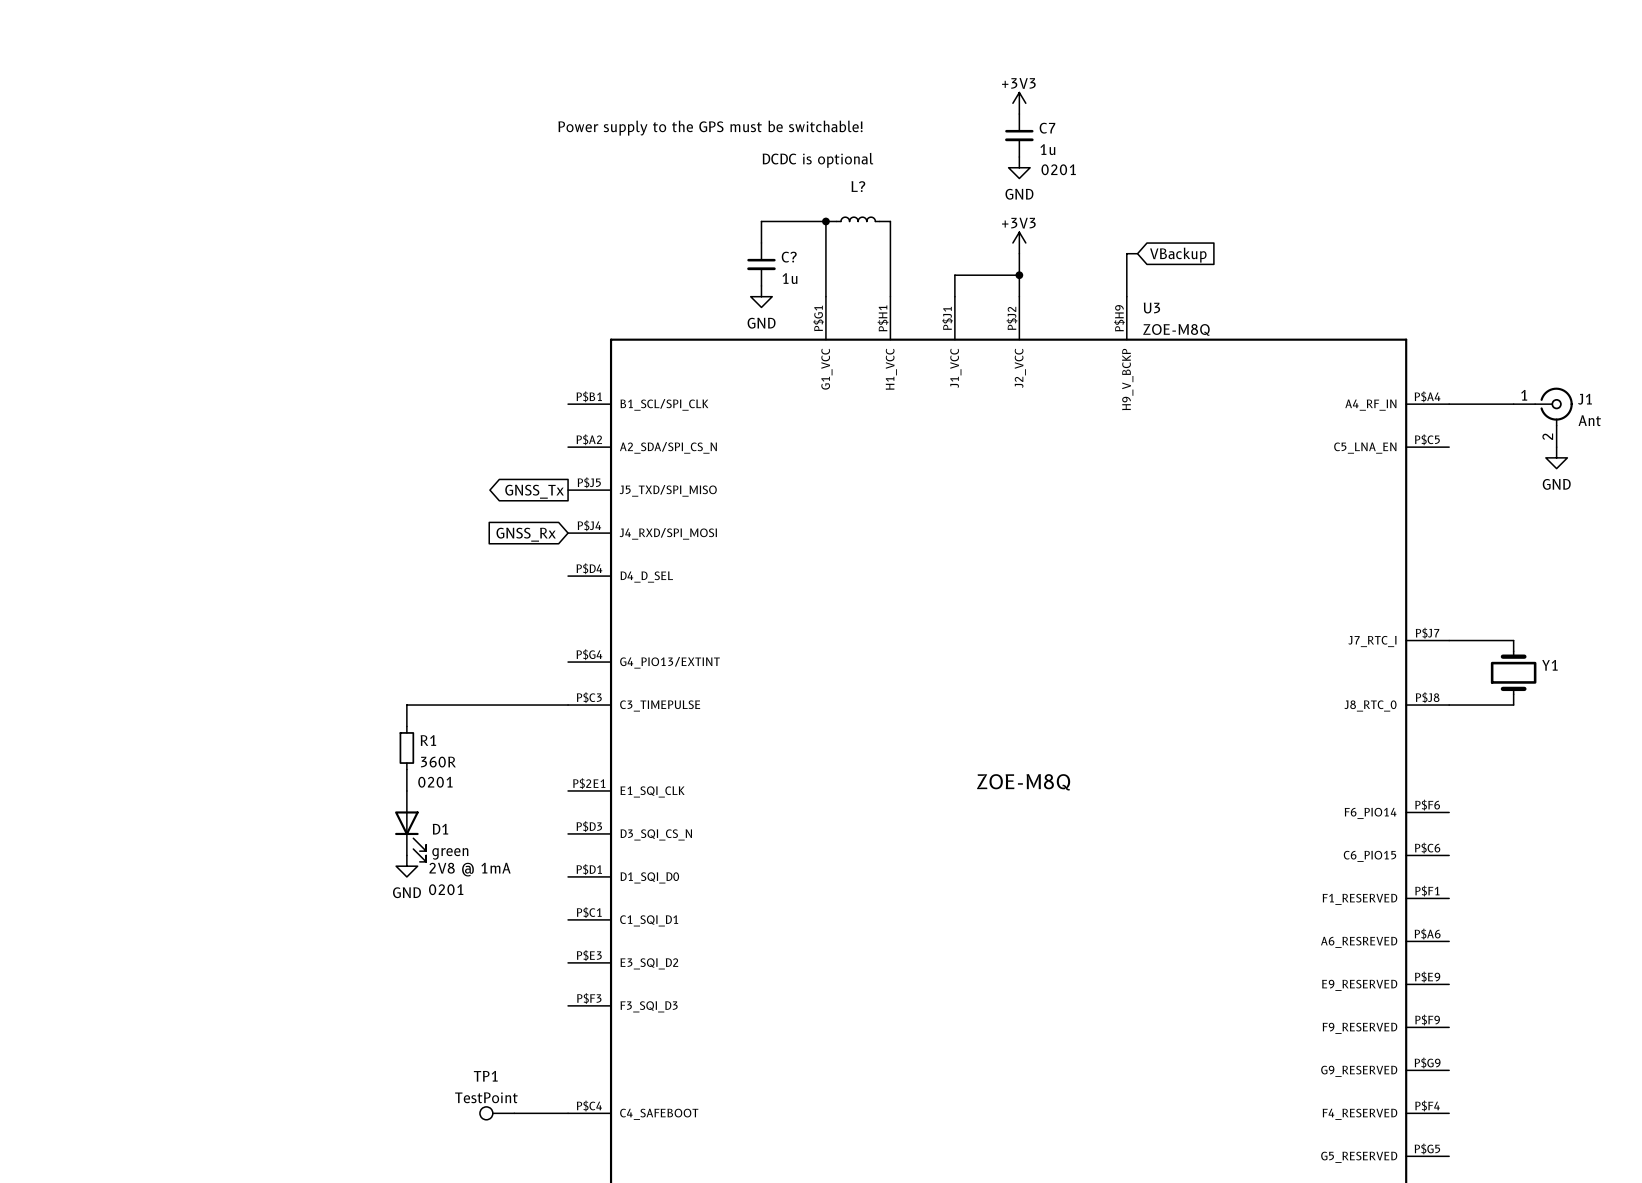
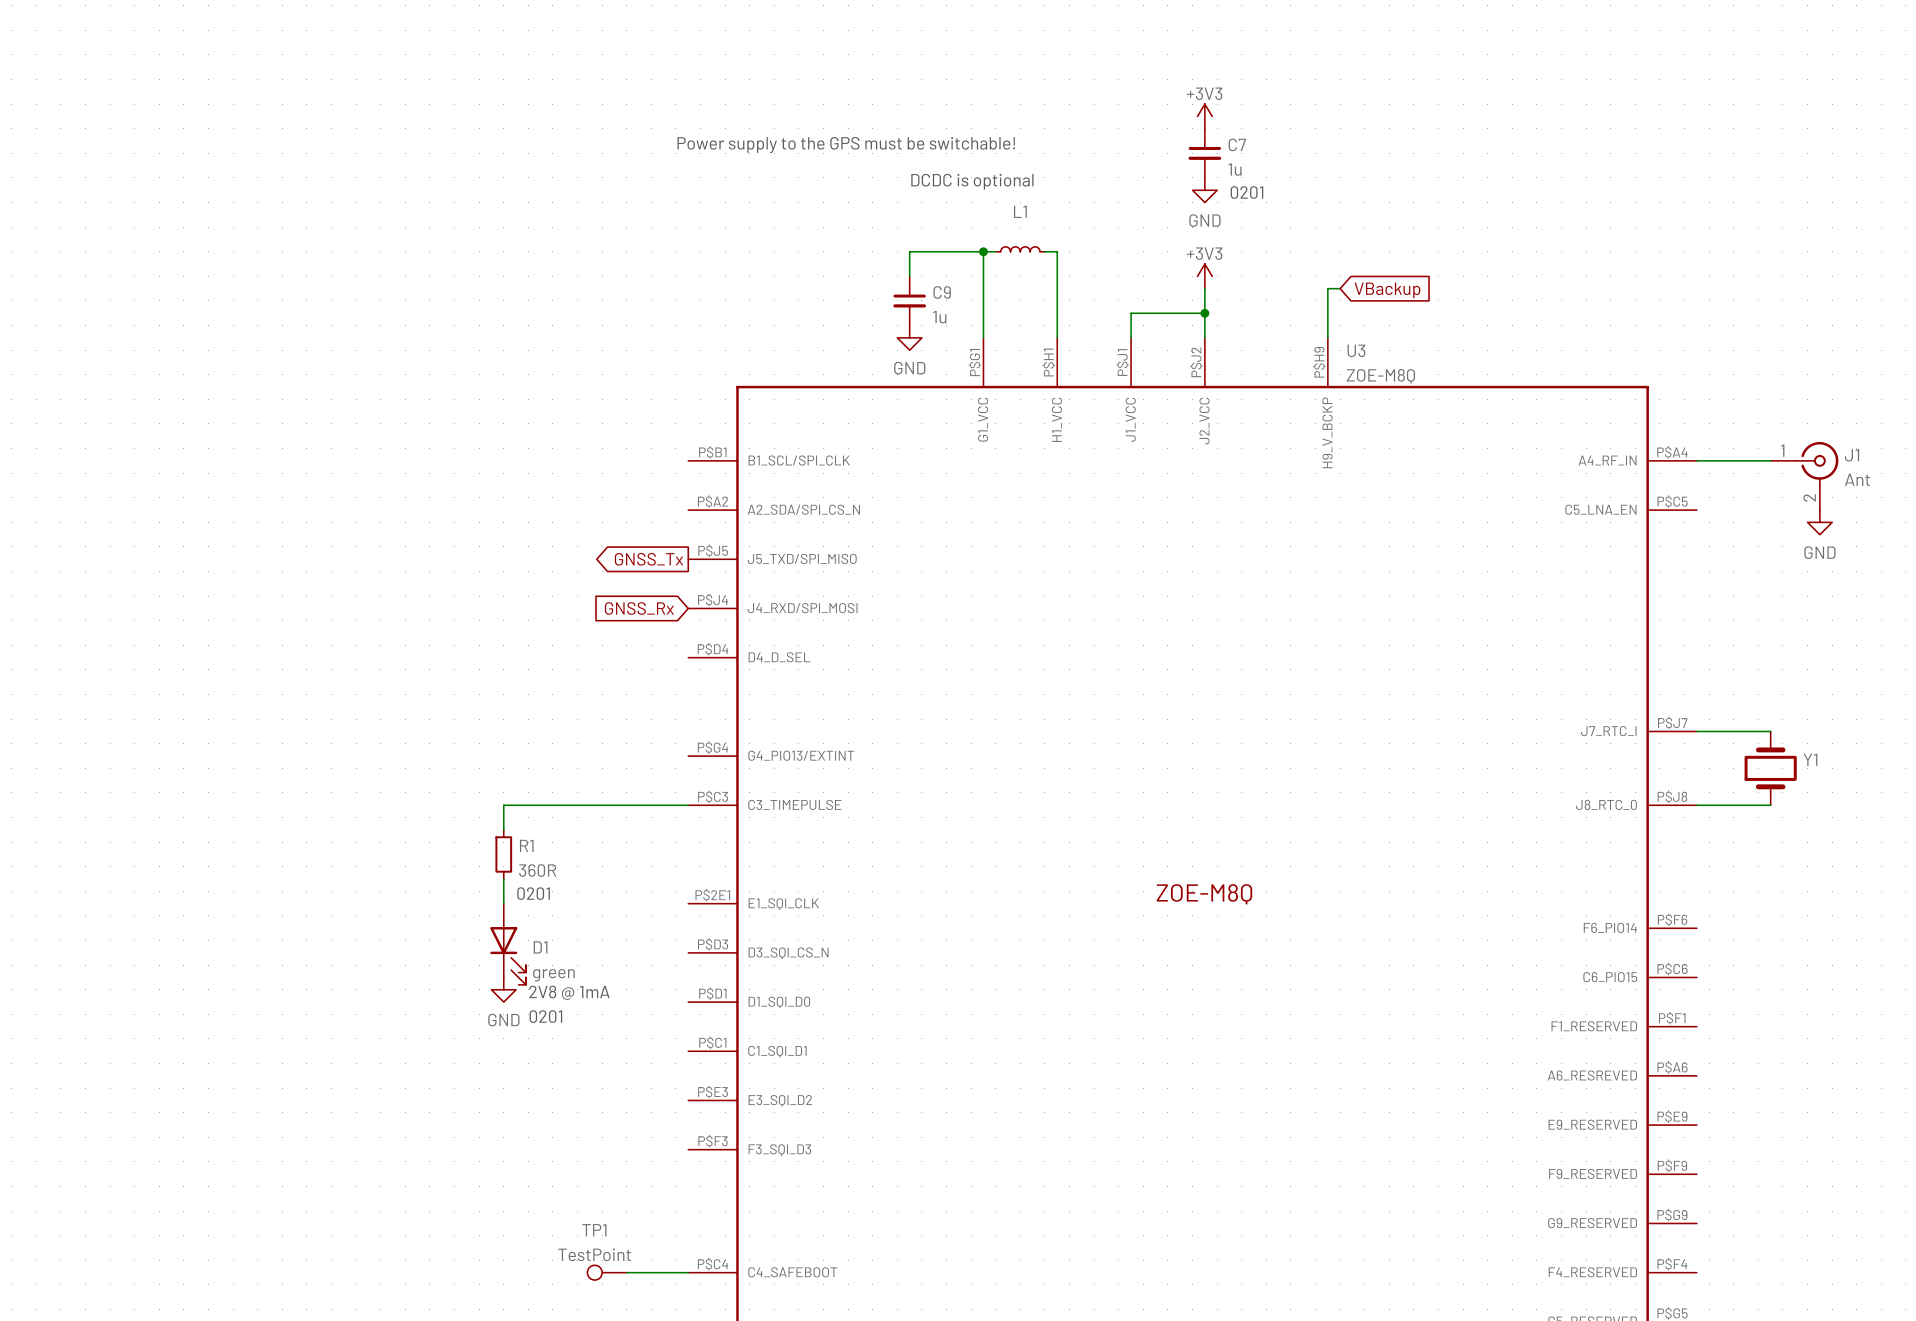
L? name: L? (858, 186) -> L1 (1020, 211)
C? name: C? (789, 257) -> C9 (942, 292)

